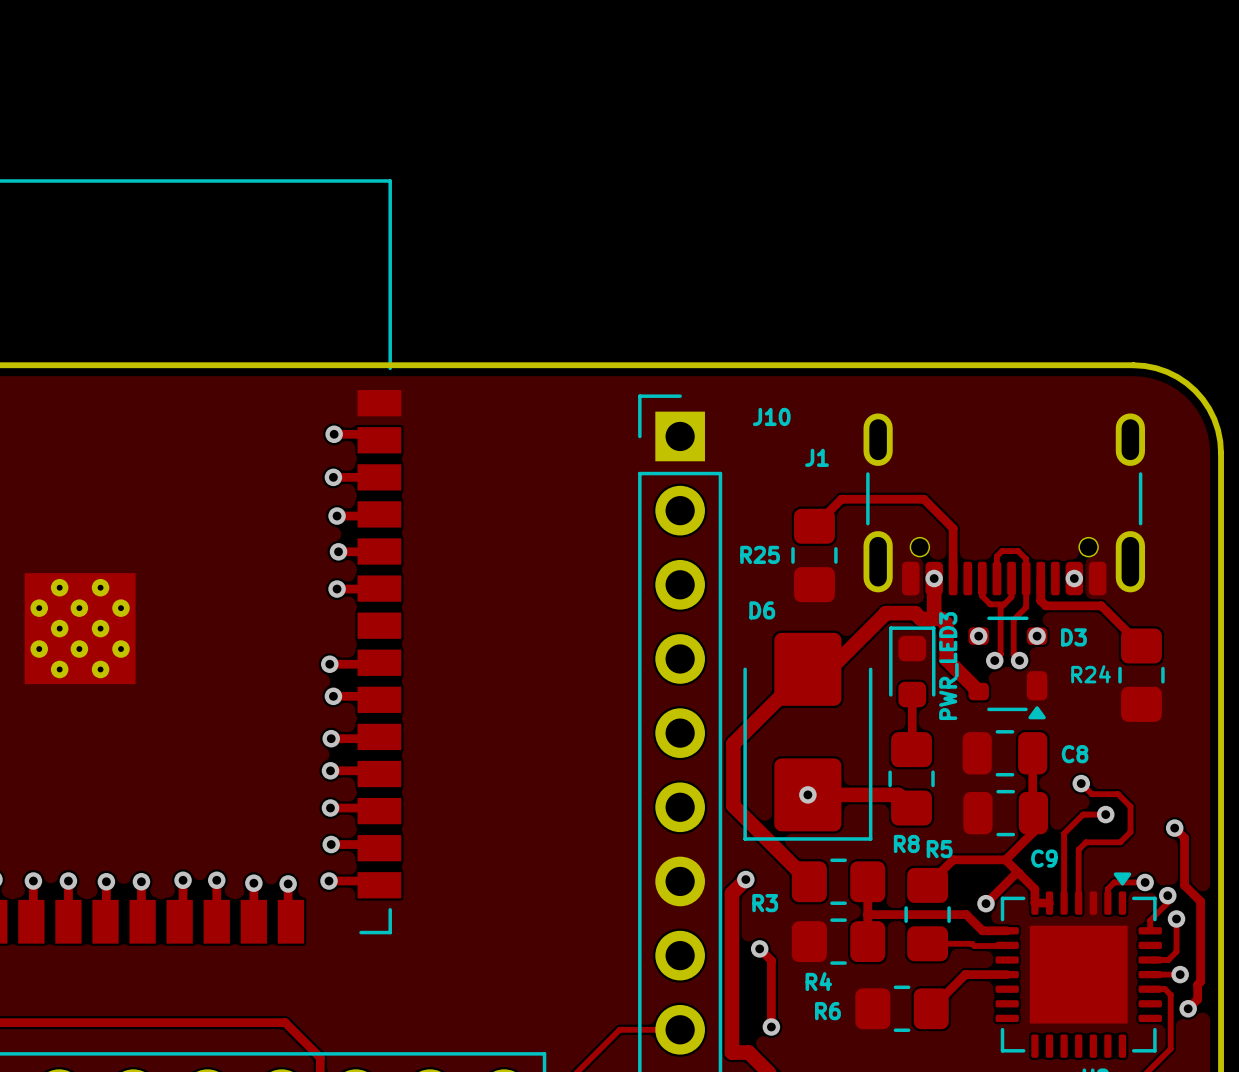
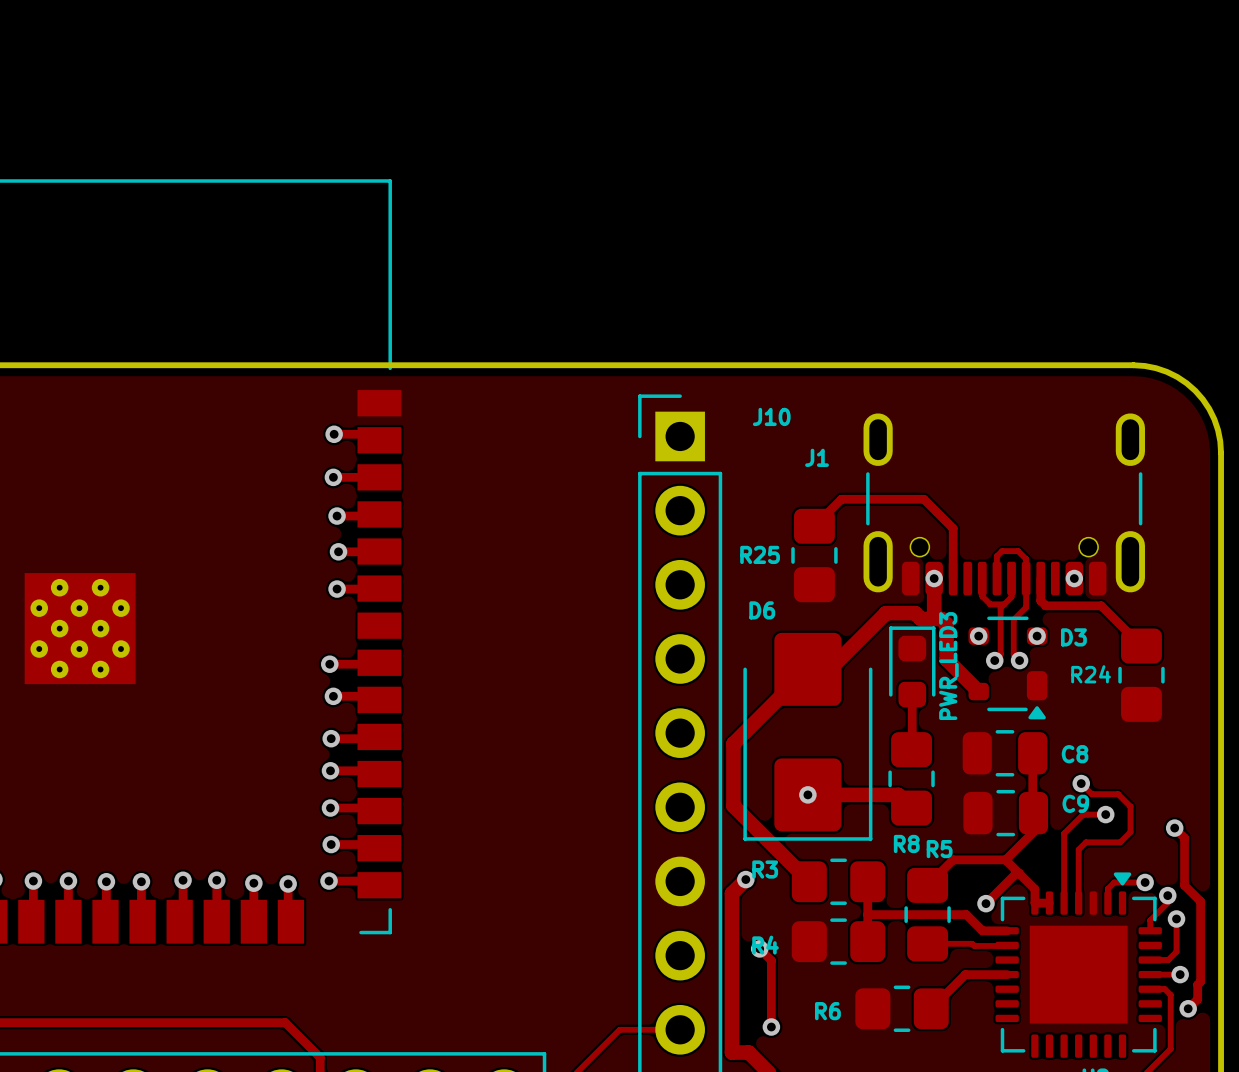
C9 name position: C9 (1044, 858) -> C9 (1075, 803)
R3 name position: R3 (765, 903) -> R3 (765, 869)
R4 name position: R4 (818, 981) -> R4 (765, 945)

